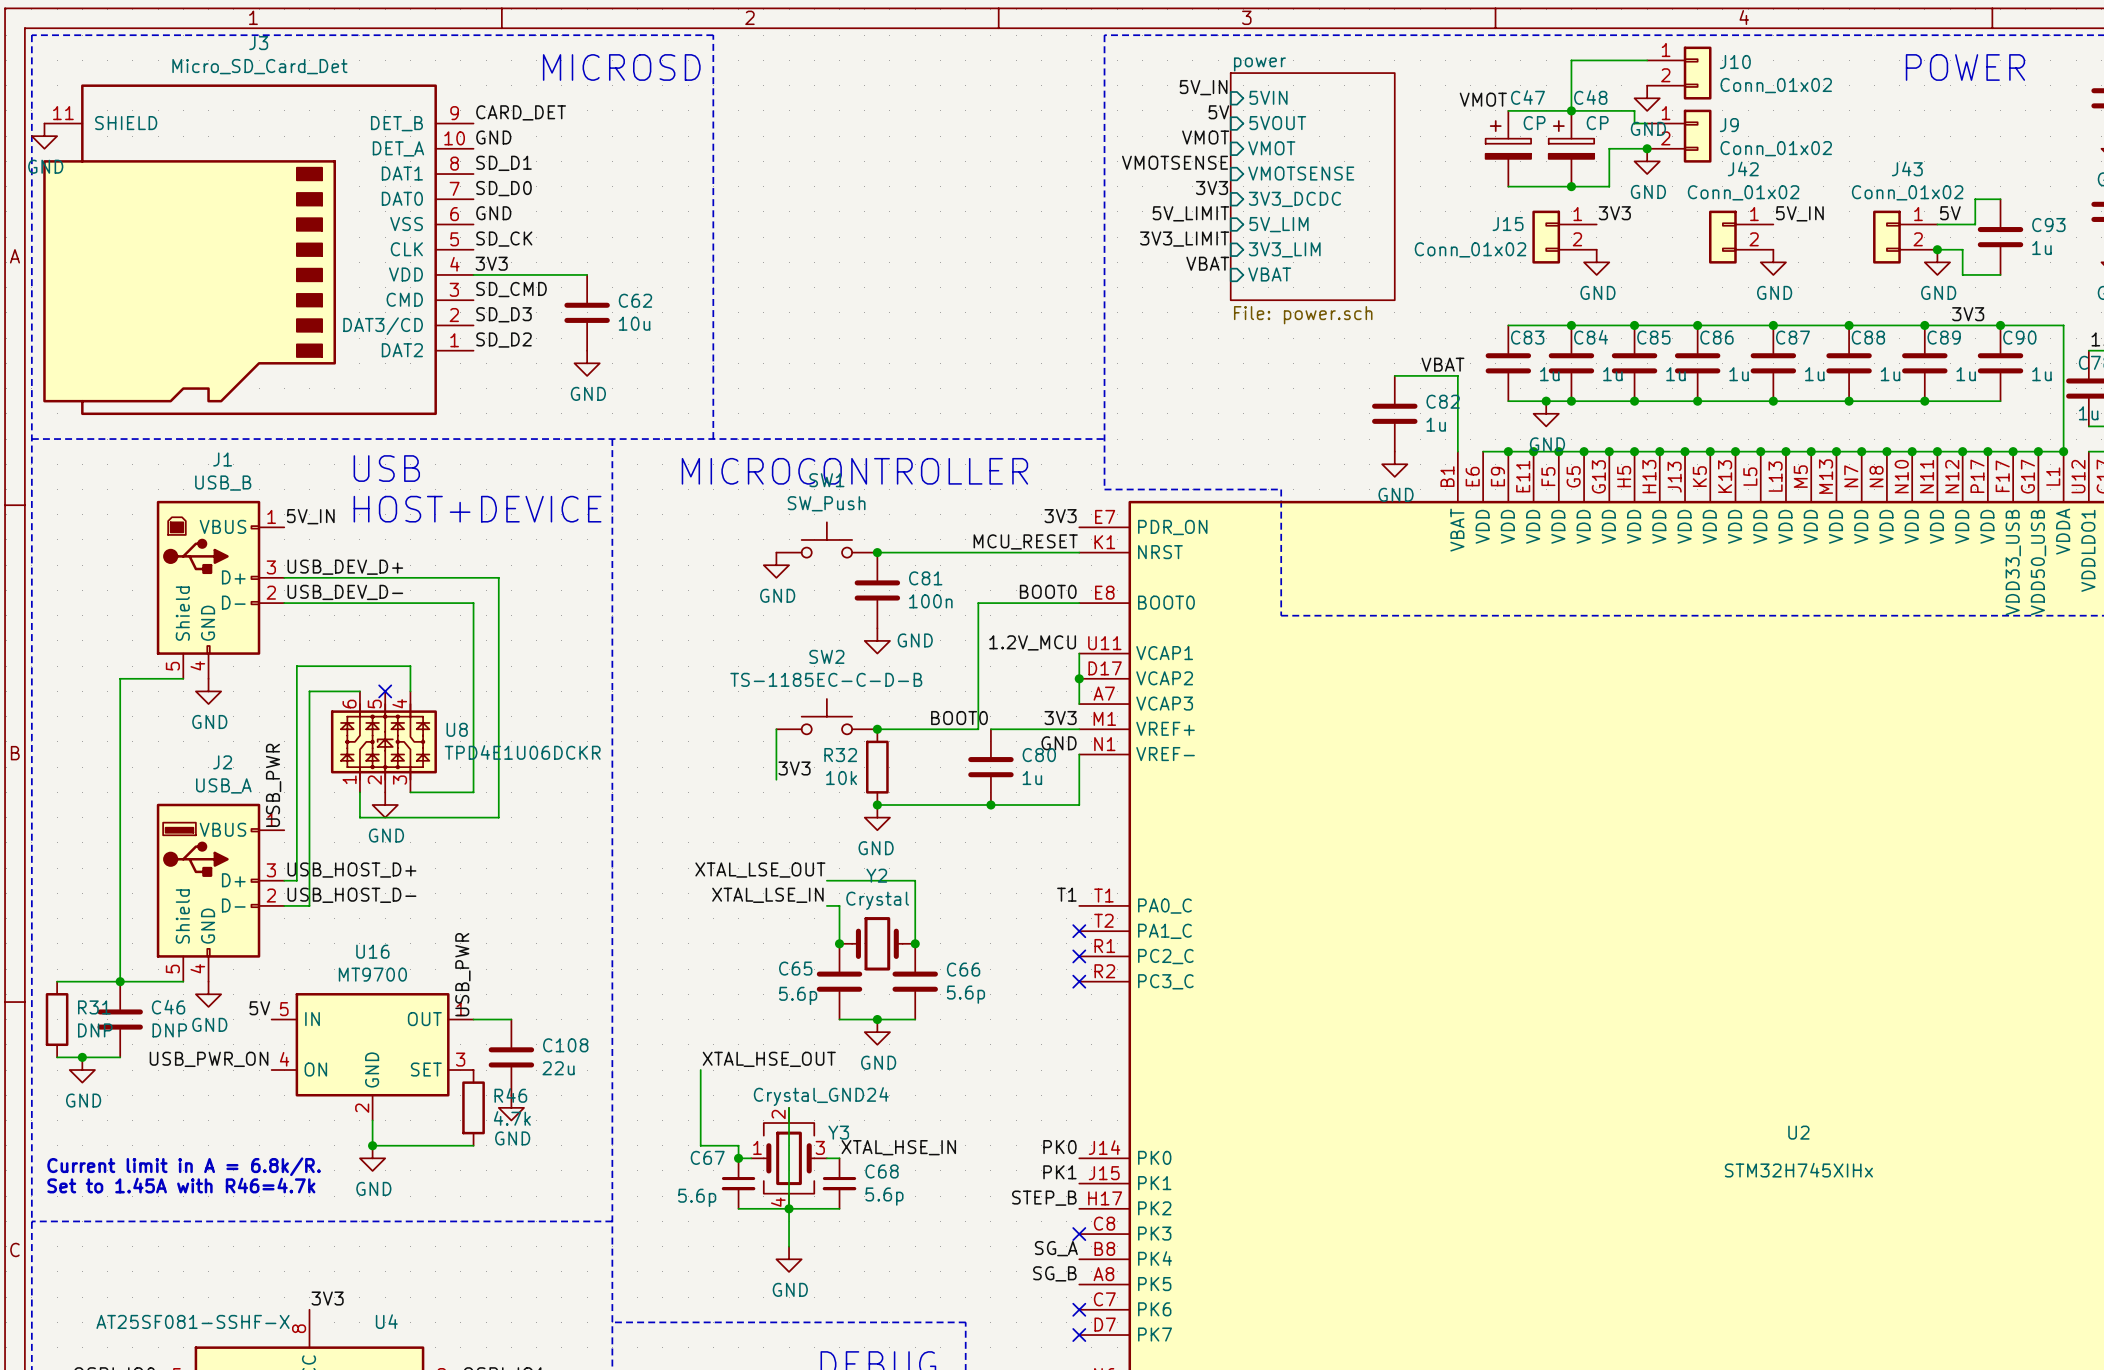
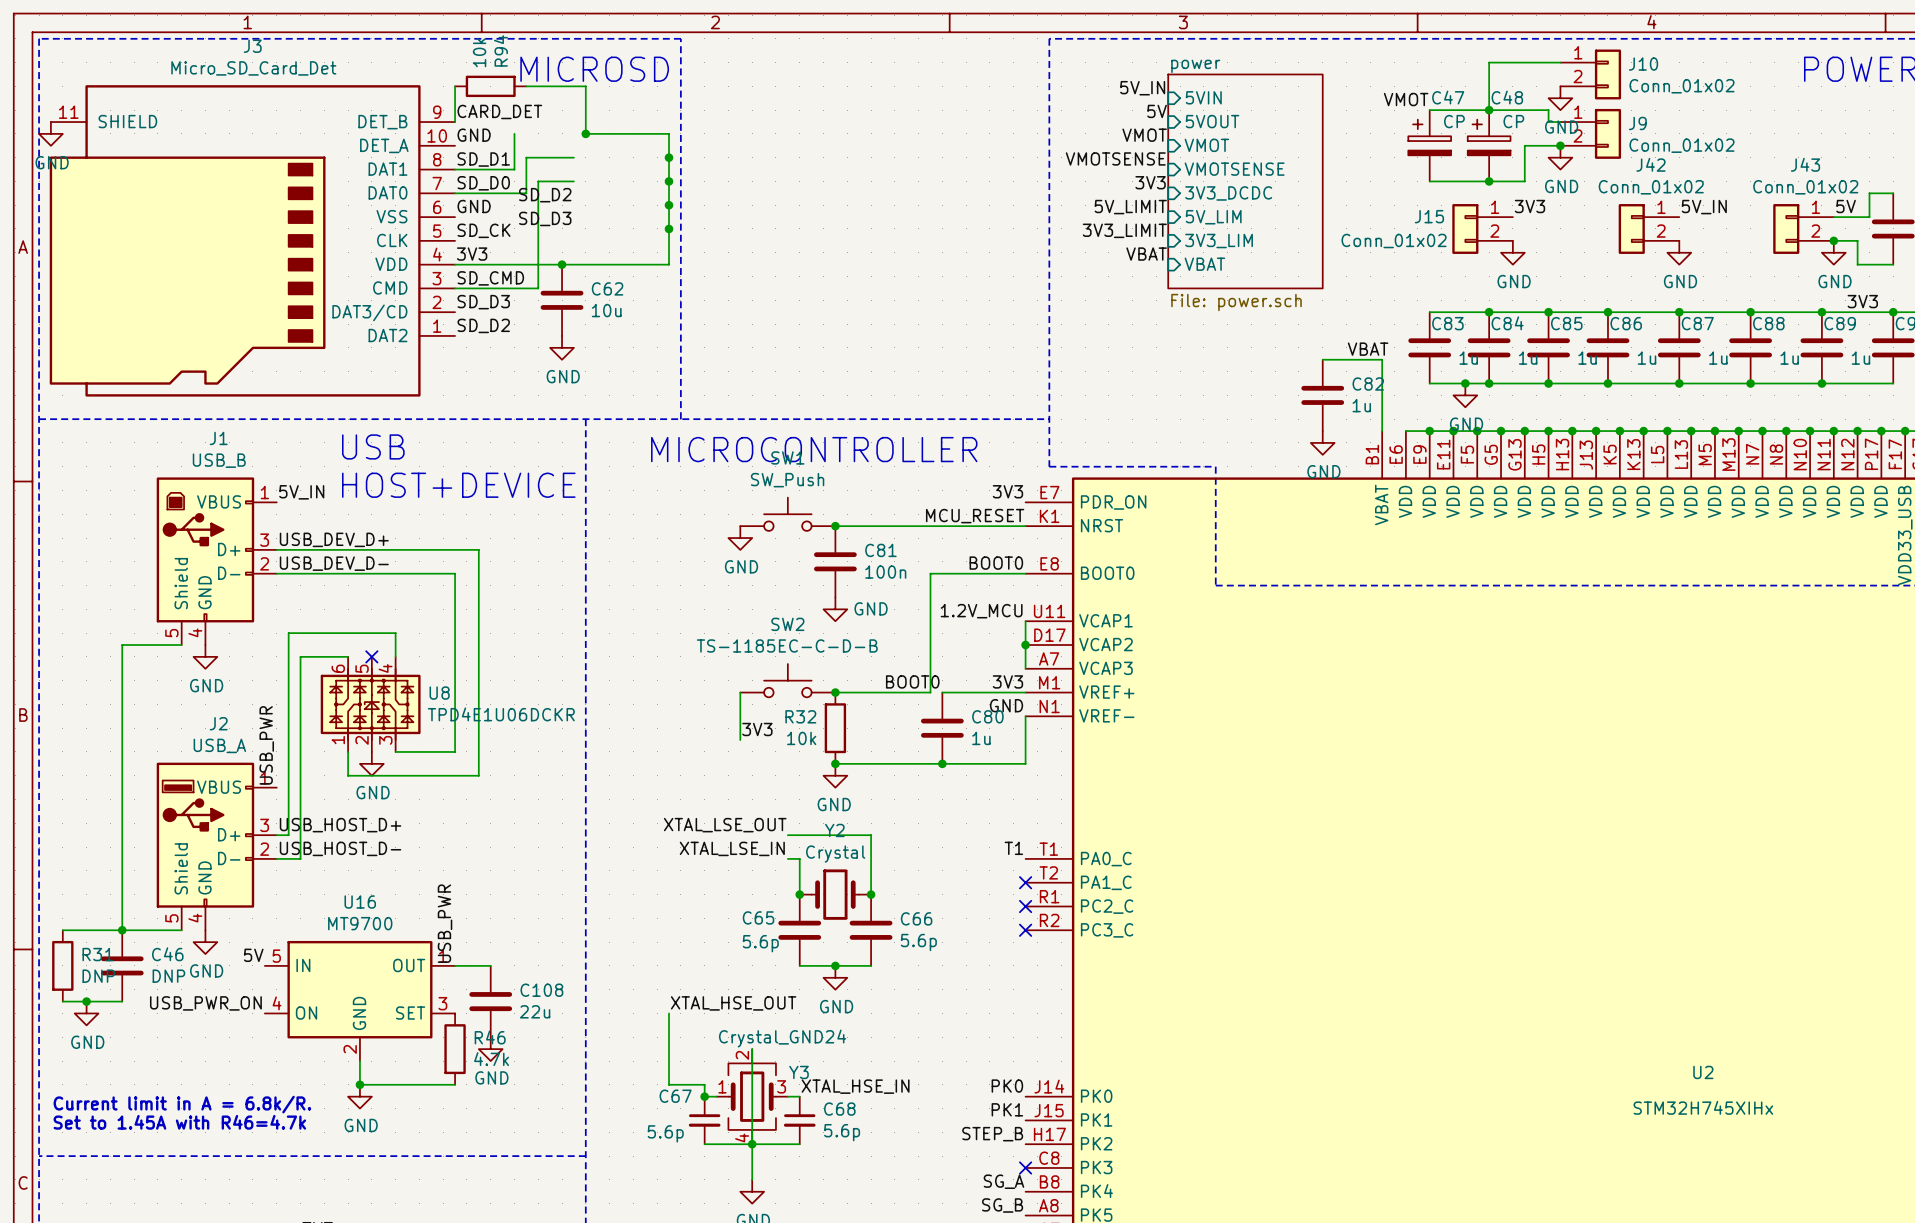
wire: none -> (455, 86) (455, 122)
R94: none -> 10k (490, 86)
wire: none -> (526, 86) (585, 86) (585, 133) (669, 133) (669, 264) (562, 264)
wire: none -> (514, 133) (514, 169) (455, 169)
junction: none -> (585, 133)
wire: none -> (573, 157) (526, 157) (526, 193) (455, 193)
junction: none -> (669, 157)
wire: none -> (573, 181) (538, 181) (538, 288) (455, 288)
junction: none -> (669, 181)
label: none -> SD_D2 (545, 195)
junction: none -> (669, 205)
label: none -> SD_D3 (545, 218)
junction: none -> (669, 228)
junction: none -> (562, 264)

